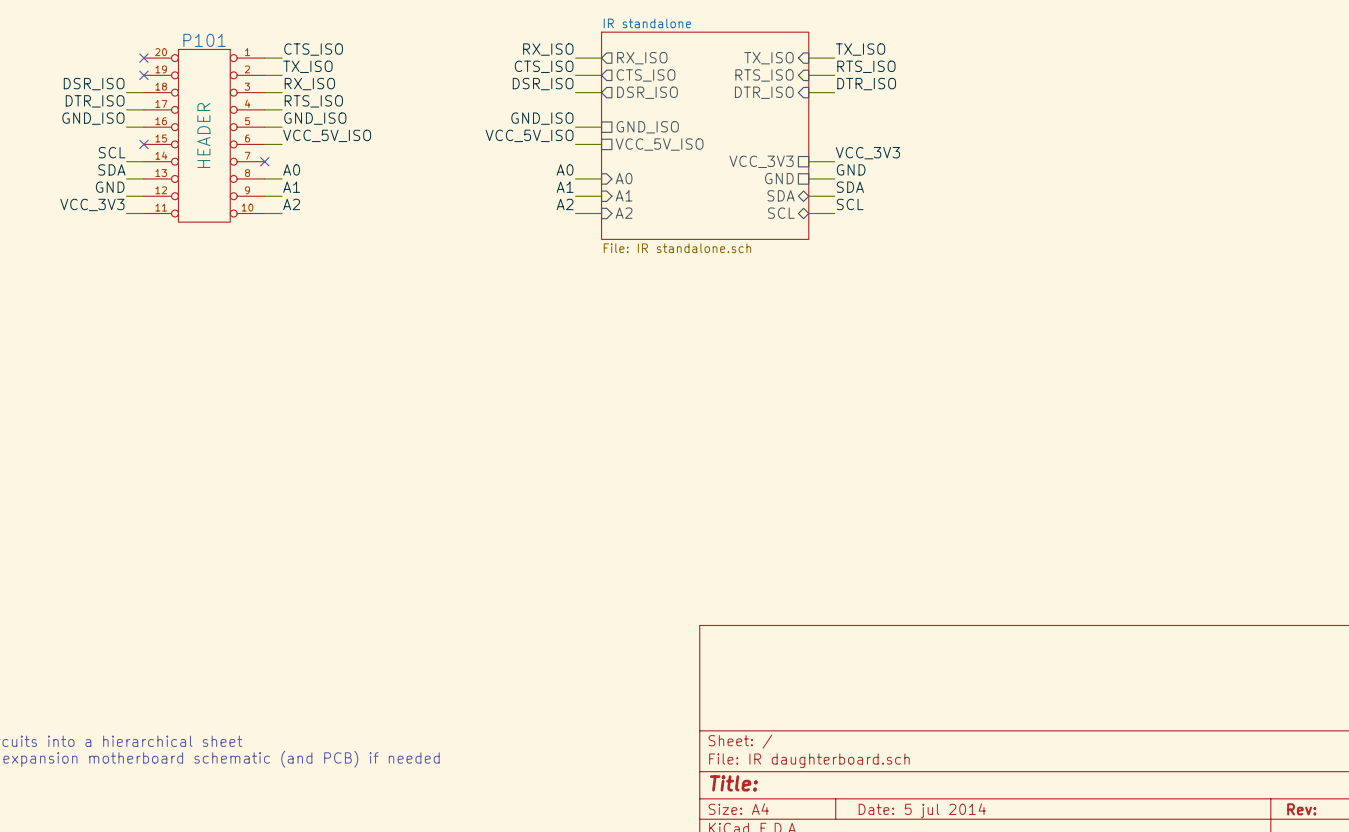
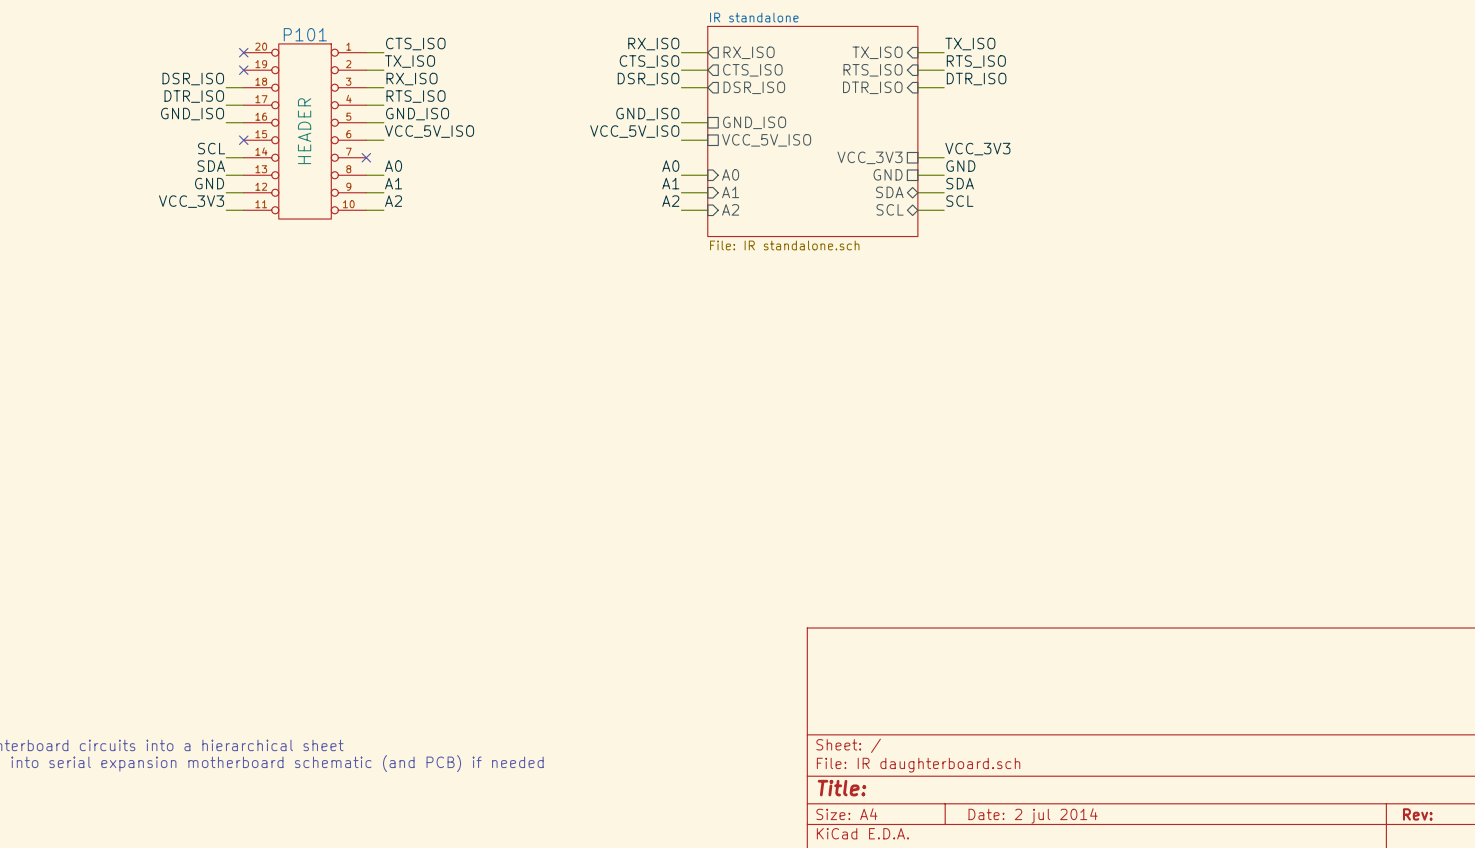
title block: Date: 5 jul 2014 (922, 810) -> Date: 2 jul 2014 (1033, 815)

